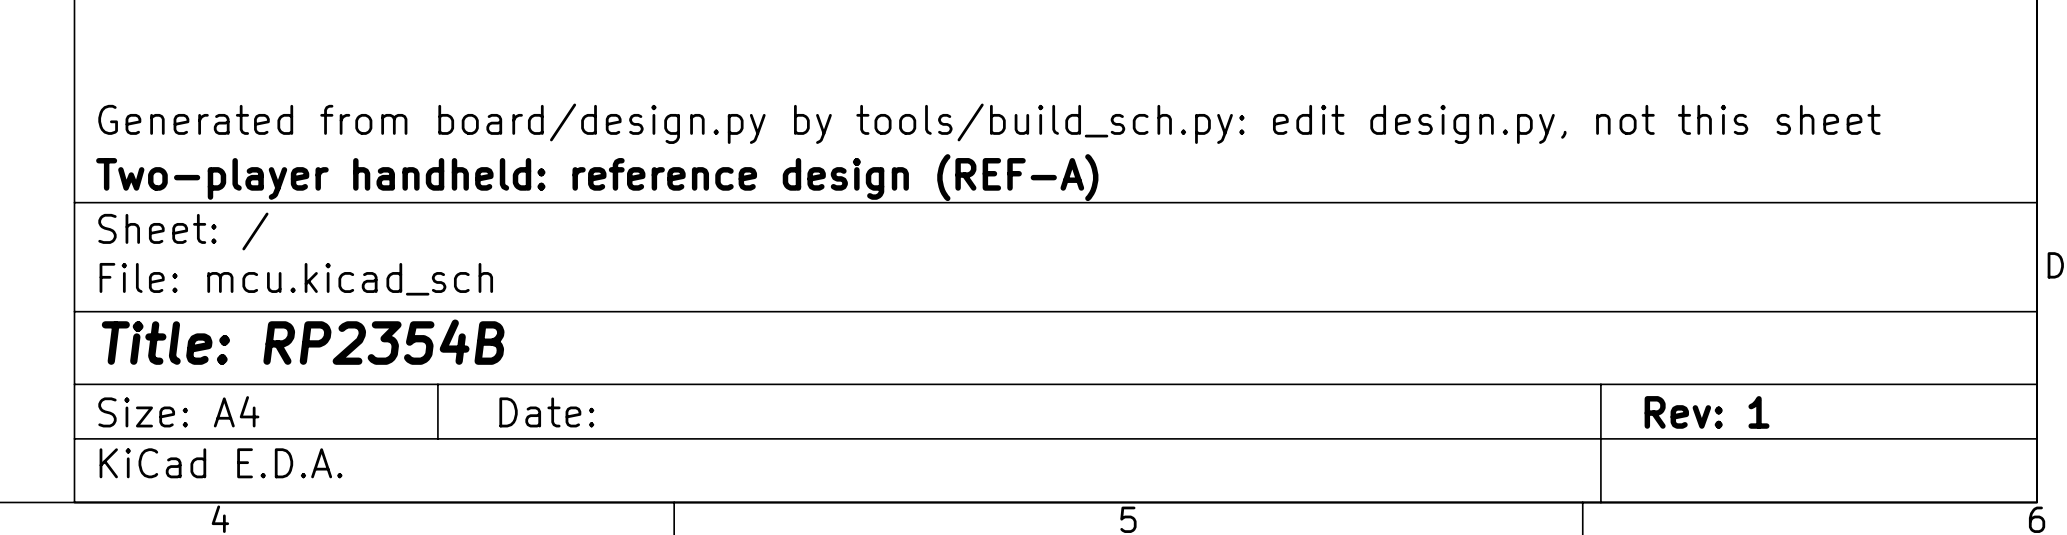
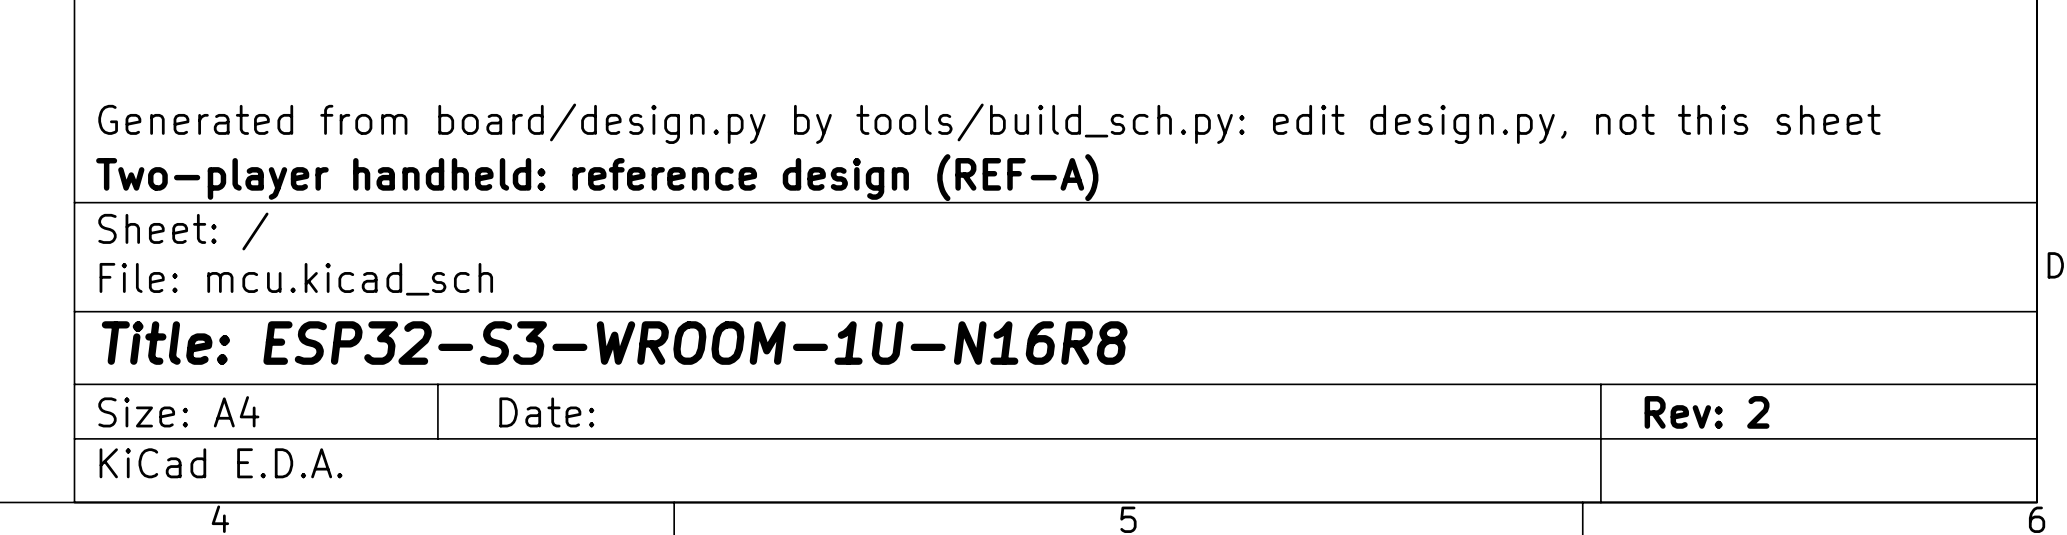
title block: Title: RP2354B (303, 342) -> Title: ESP32-S3-WROOM-1U-N16R8 (614, 343)
title block: Rev: 1 (1707, 412) -> Rev: 2 (1707, 412)

